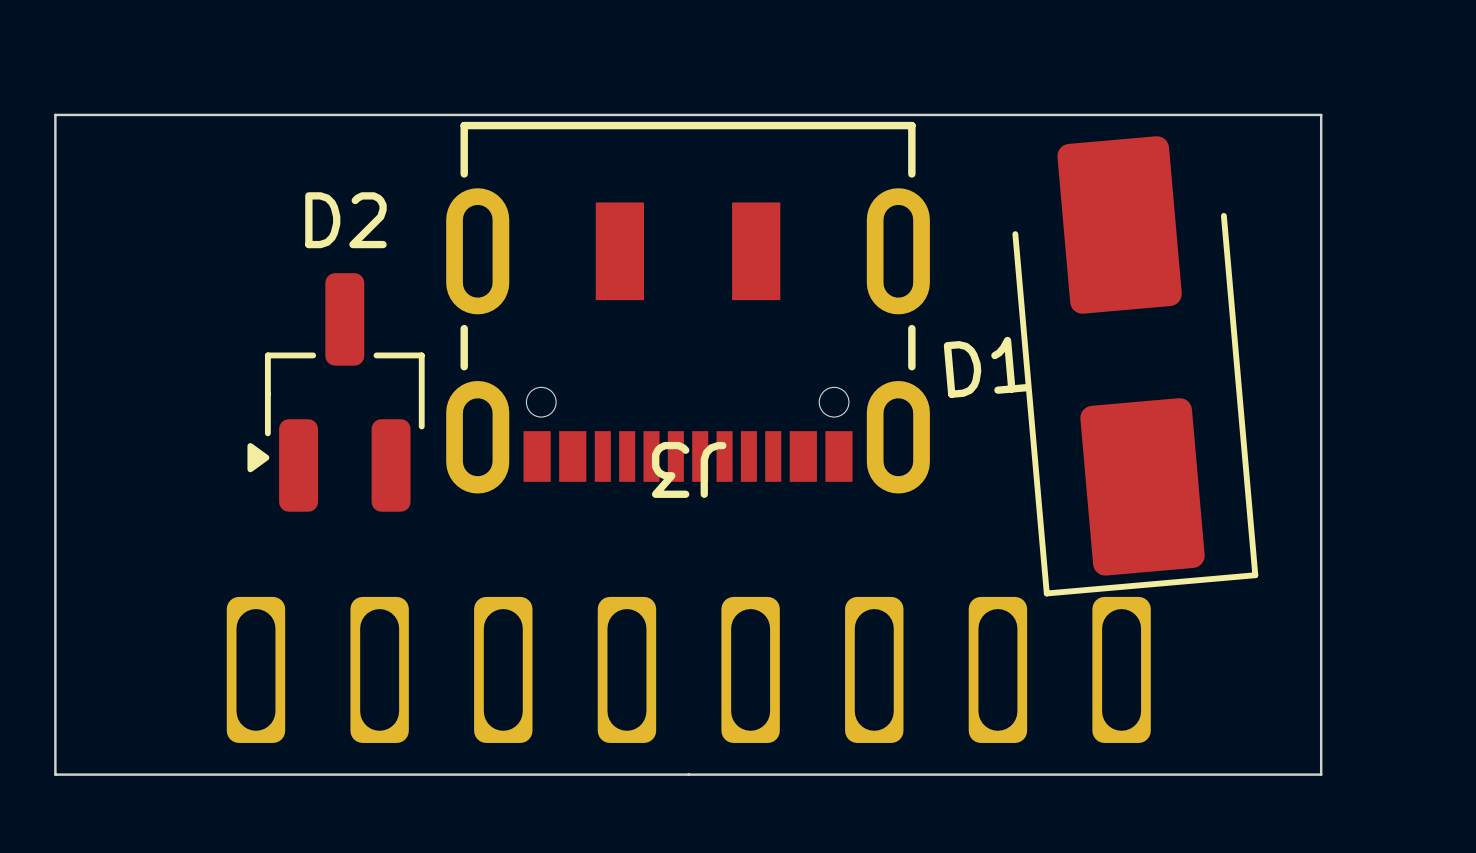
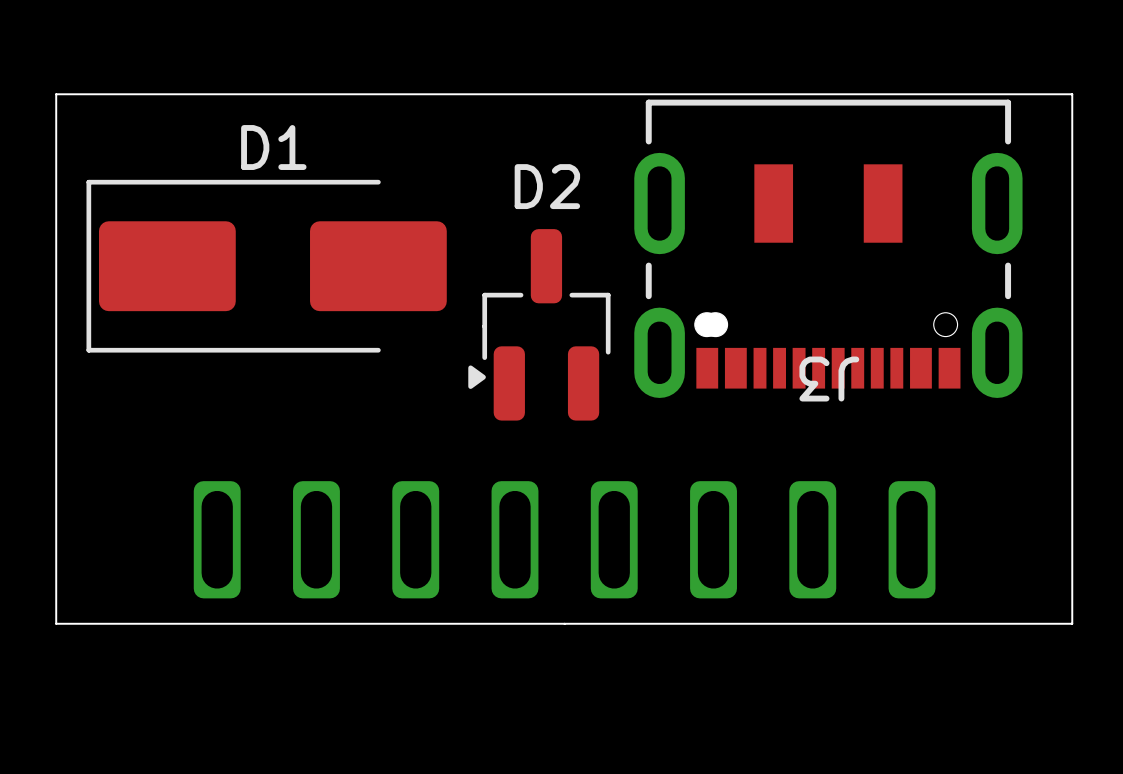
J3 footprint: [446, 121, 930, 494] -> [634, 99, 1023, 398]
D1 rotation: 0° (1135, 366) -> 95° clockwise (266, 266)
D1 position: (1135, 366) -> (266, 266)
D2 position: (336, 392) -> (539, 324)

